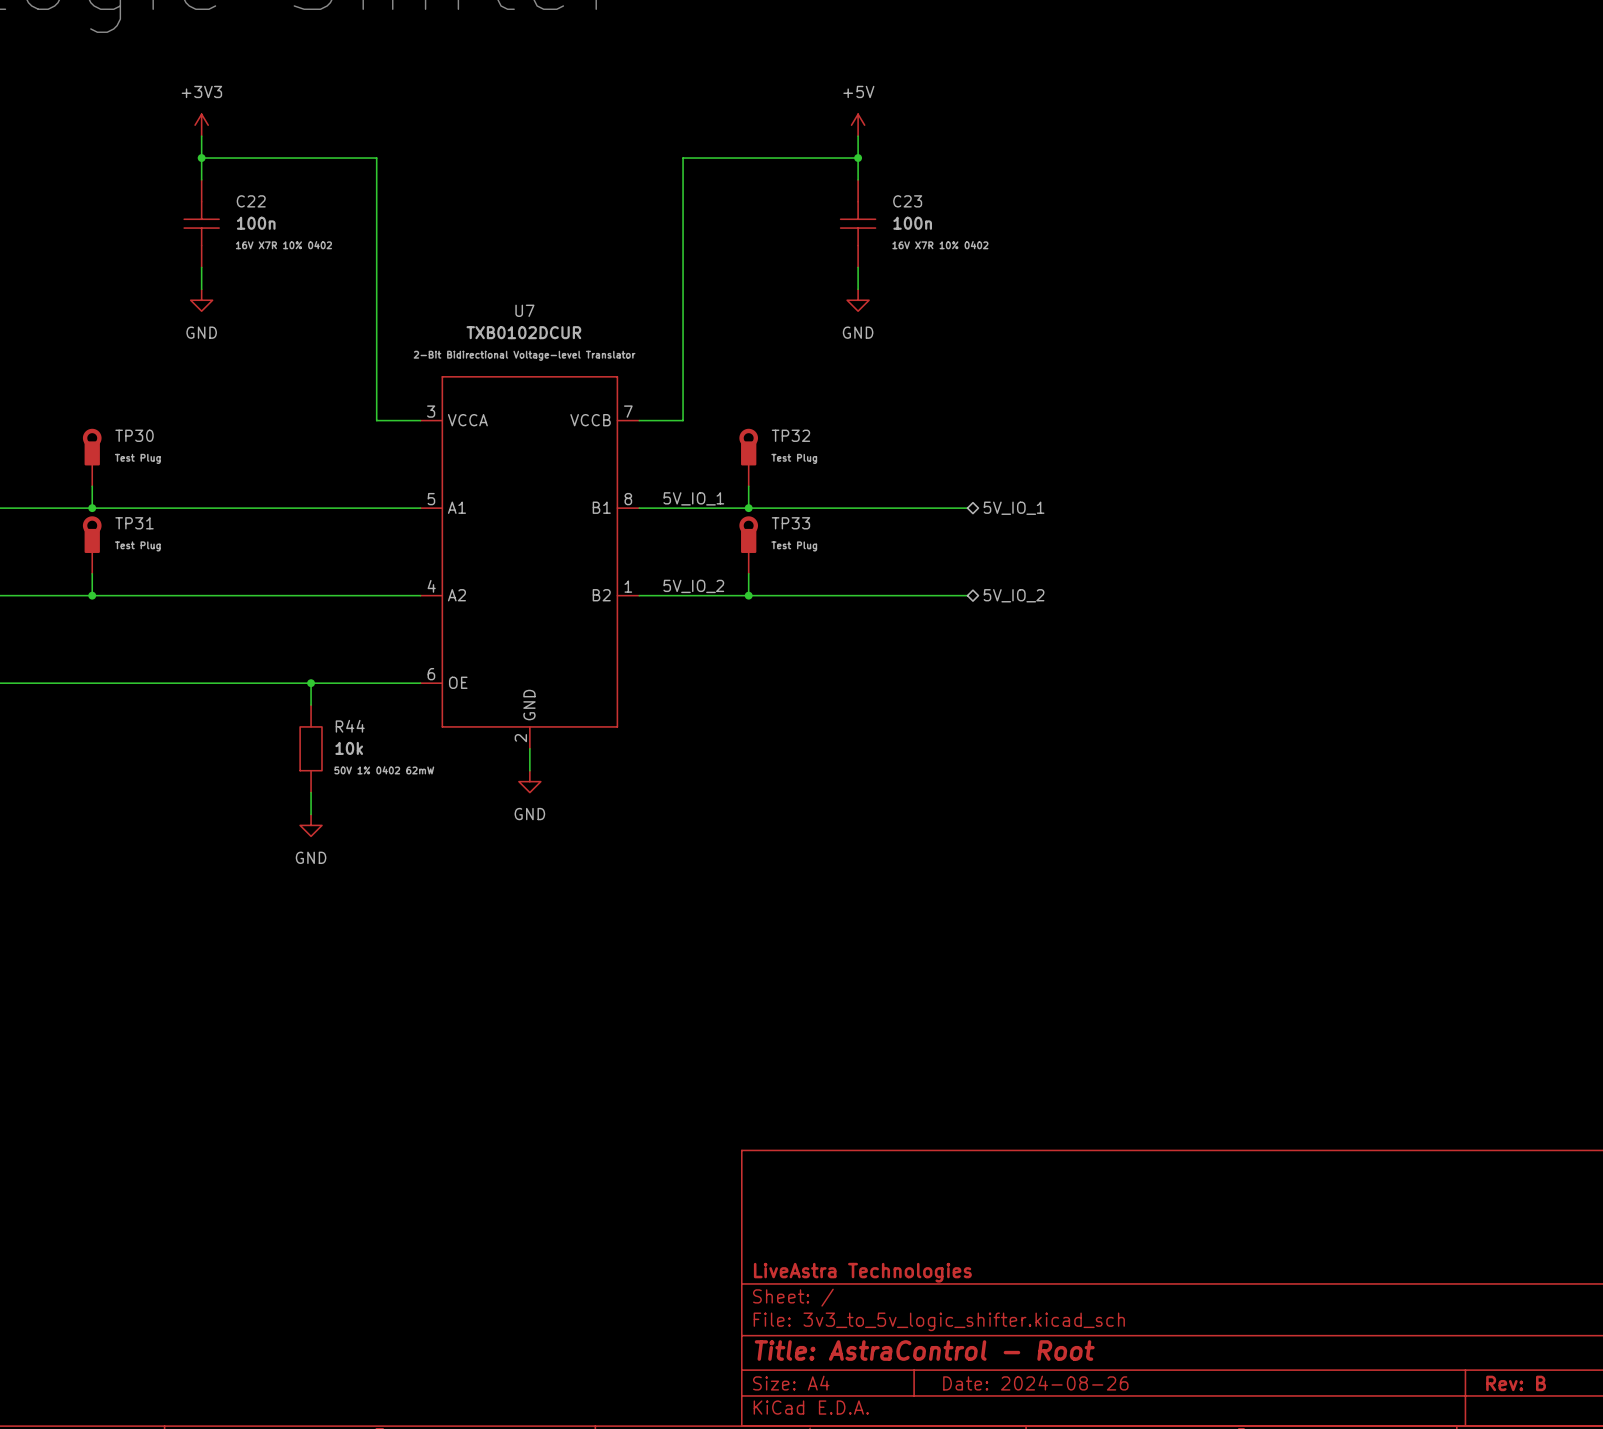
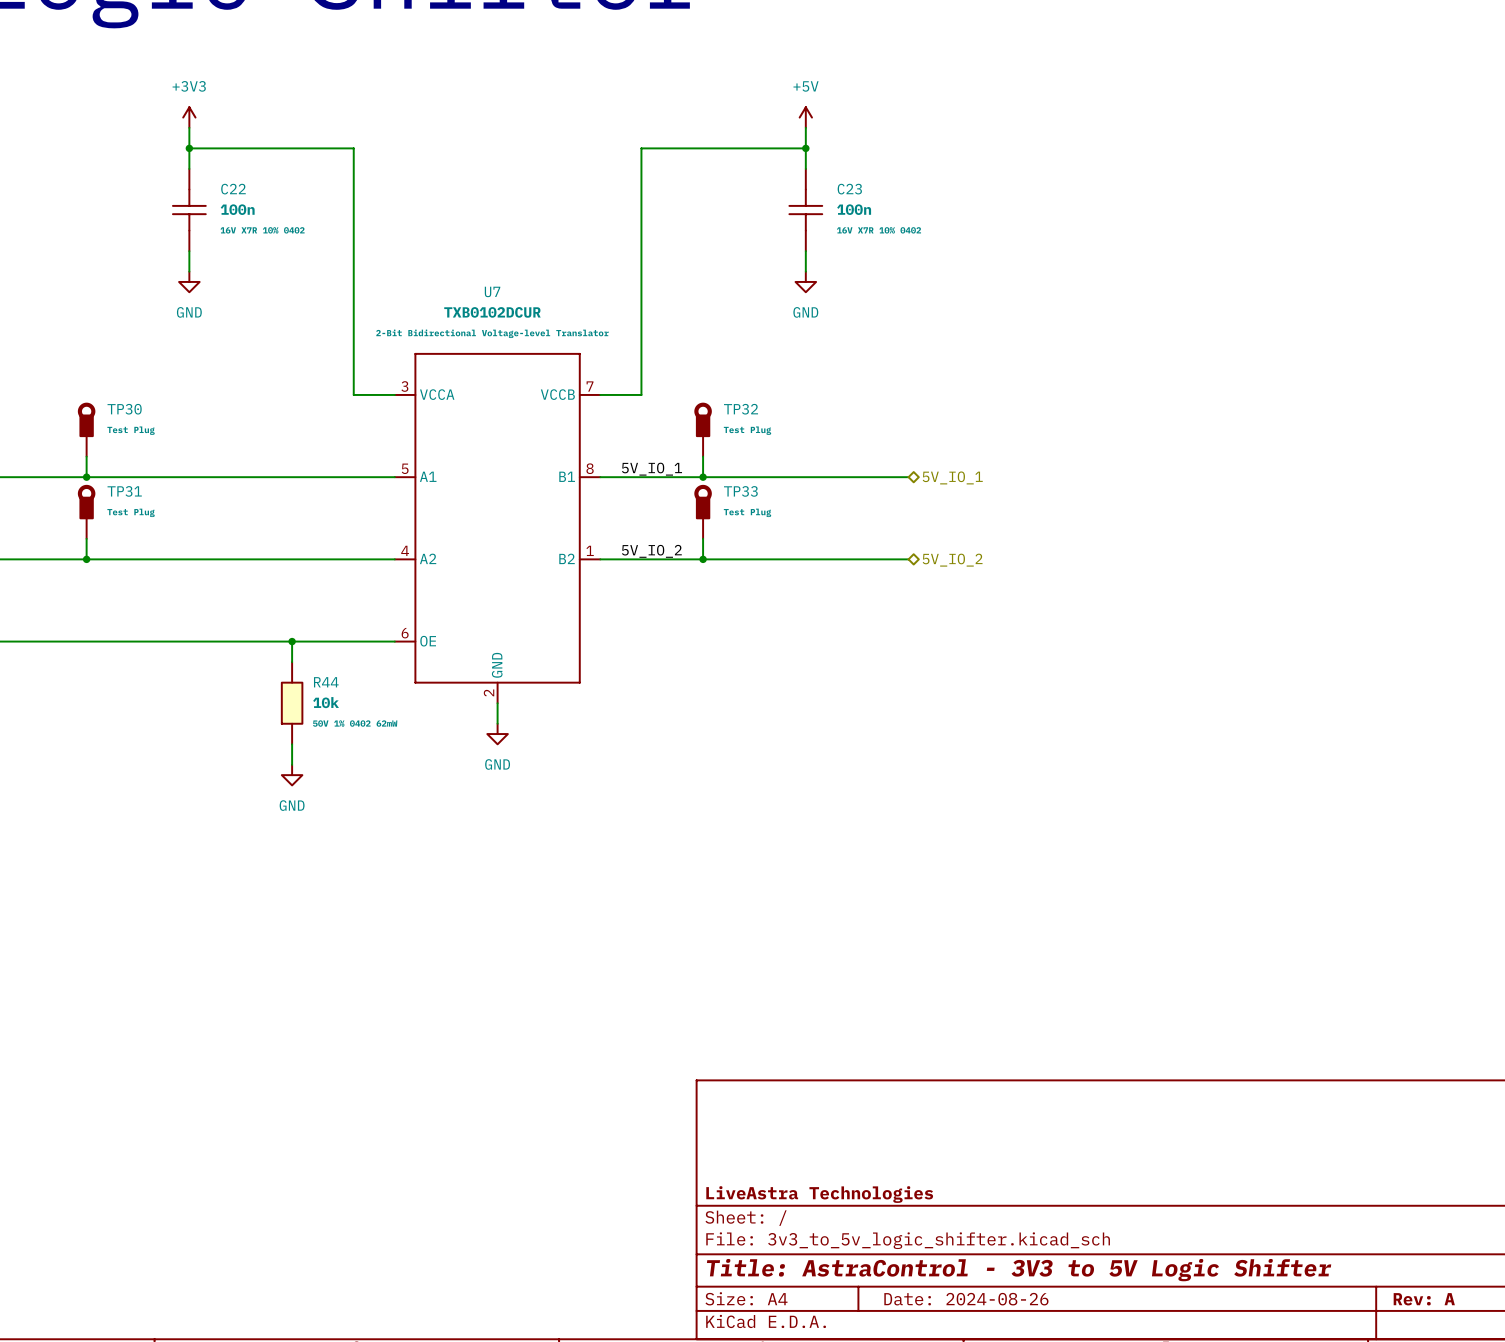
title block: Title: AstraControl - Root (924, 1350) -> Title: AstraControl - 3V3 to 5V Logic Shifter (1019, 1270)
title block: Rev: B (1516, 1383) -> Rev: A (1424, 1299)

